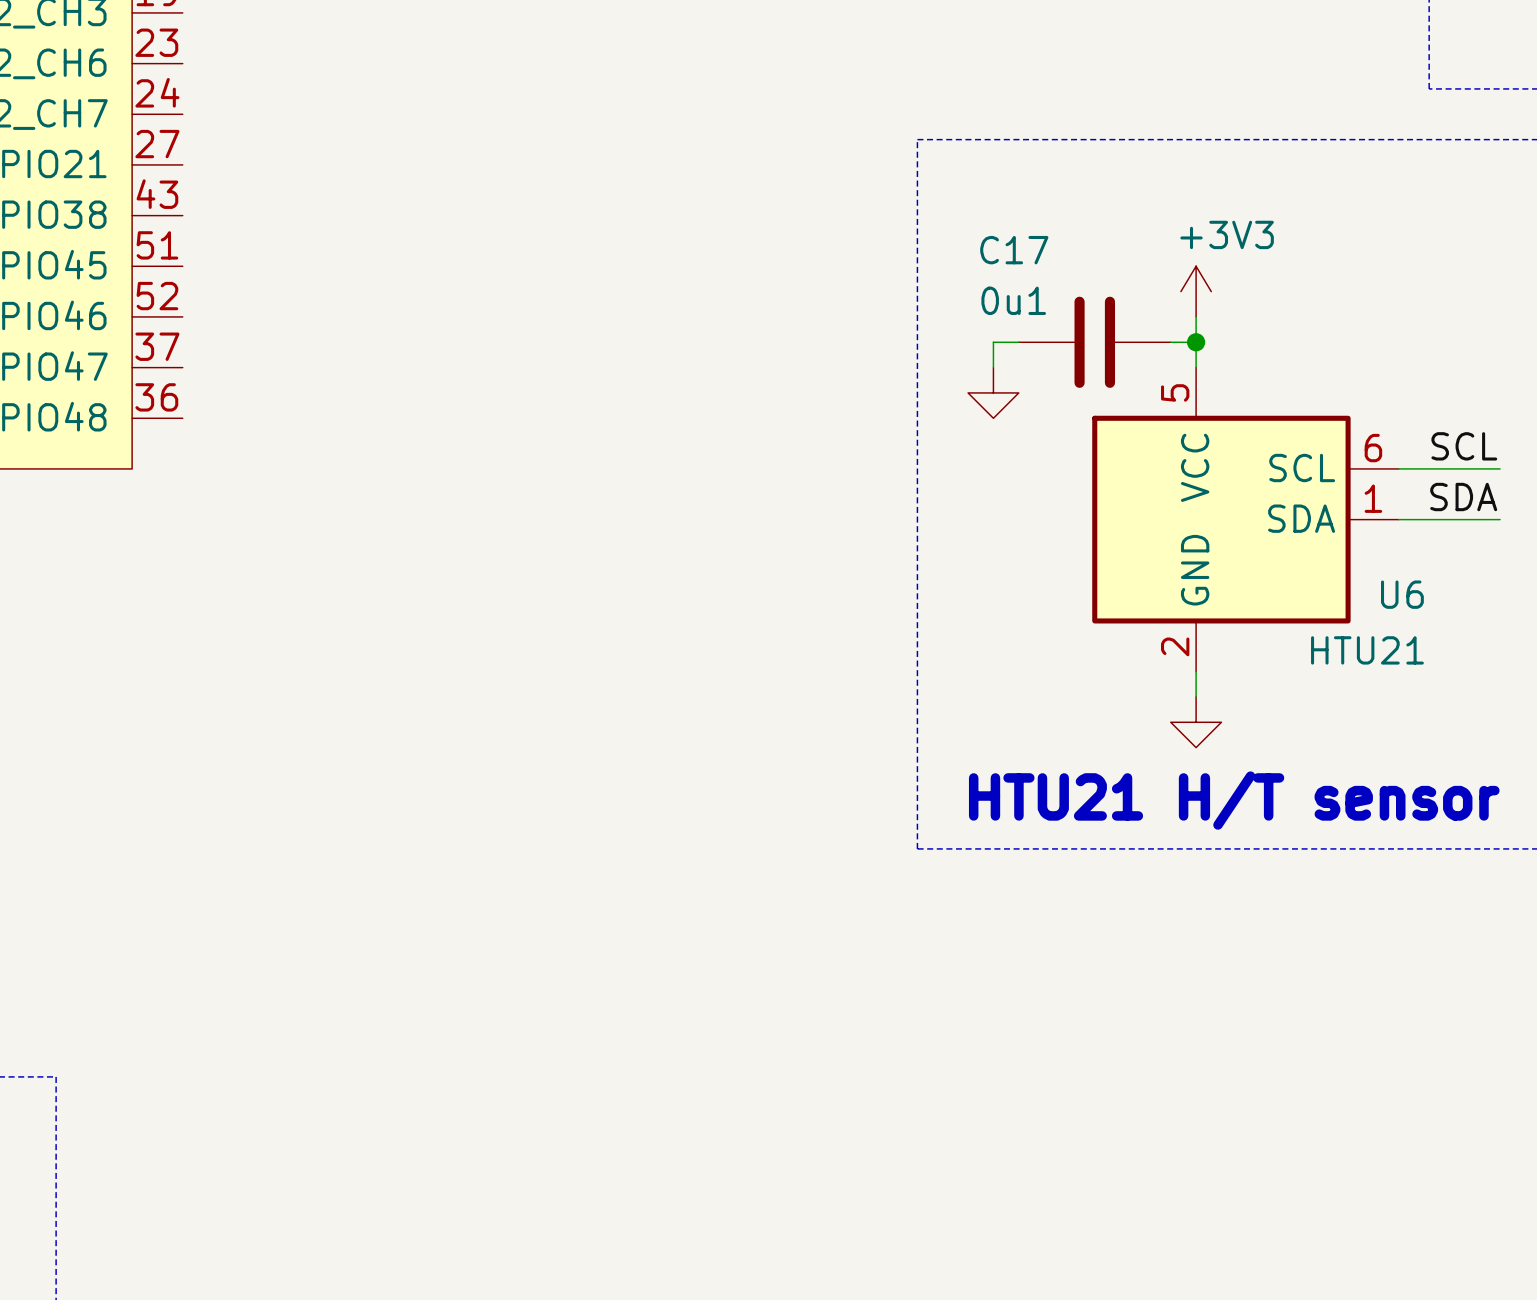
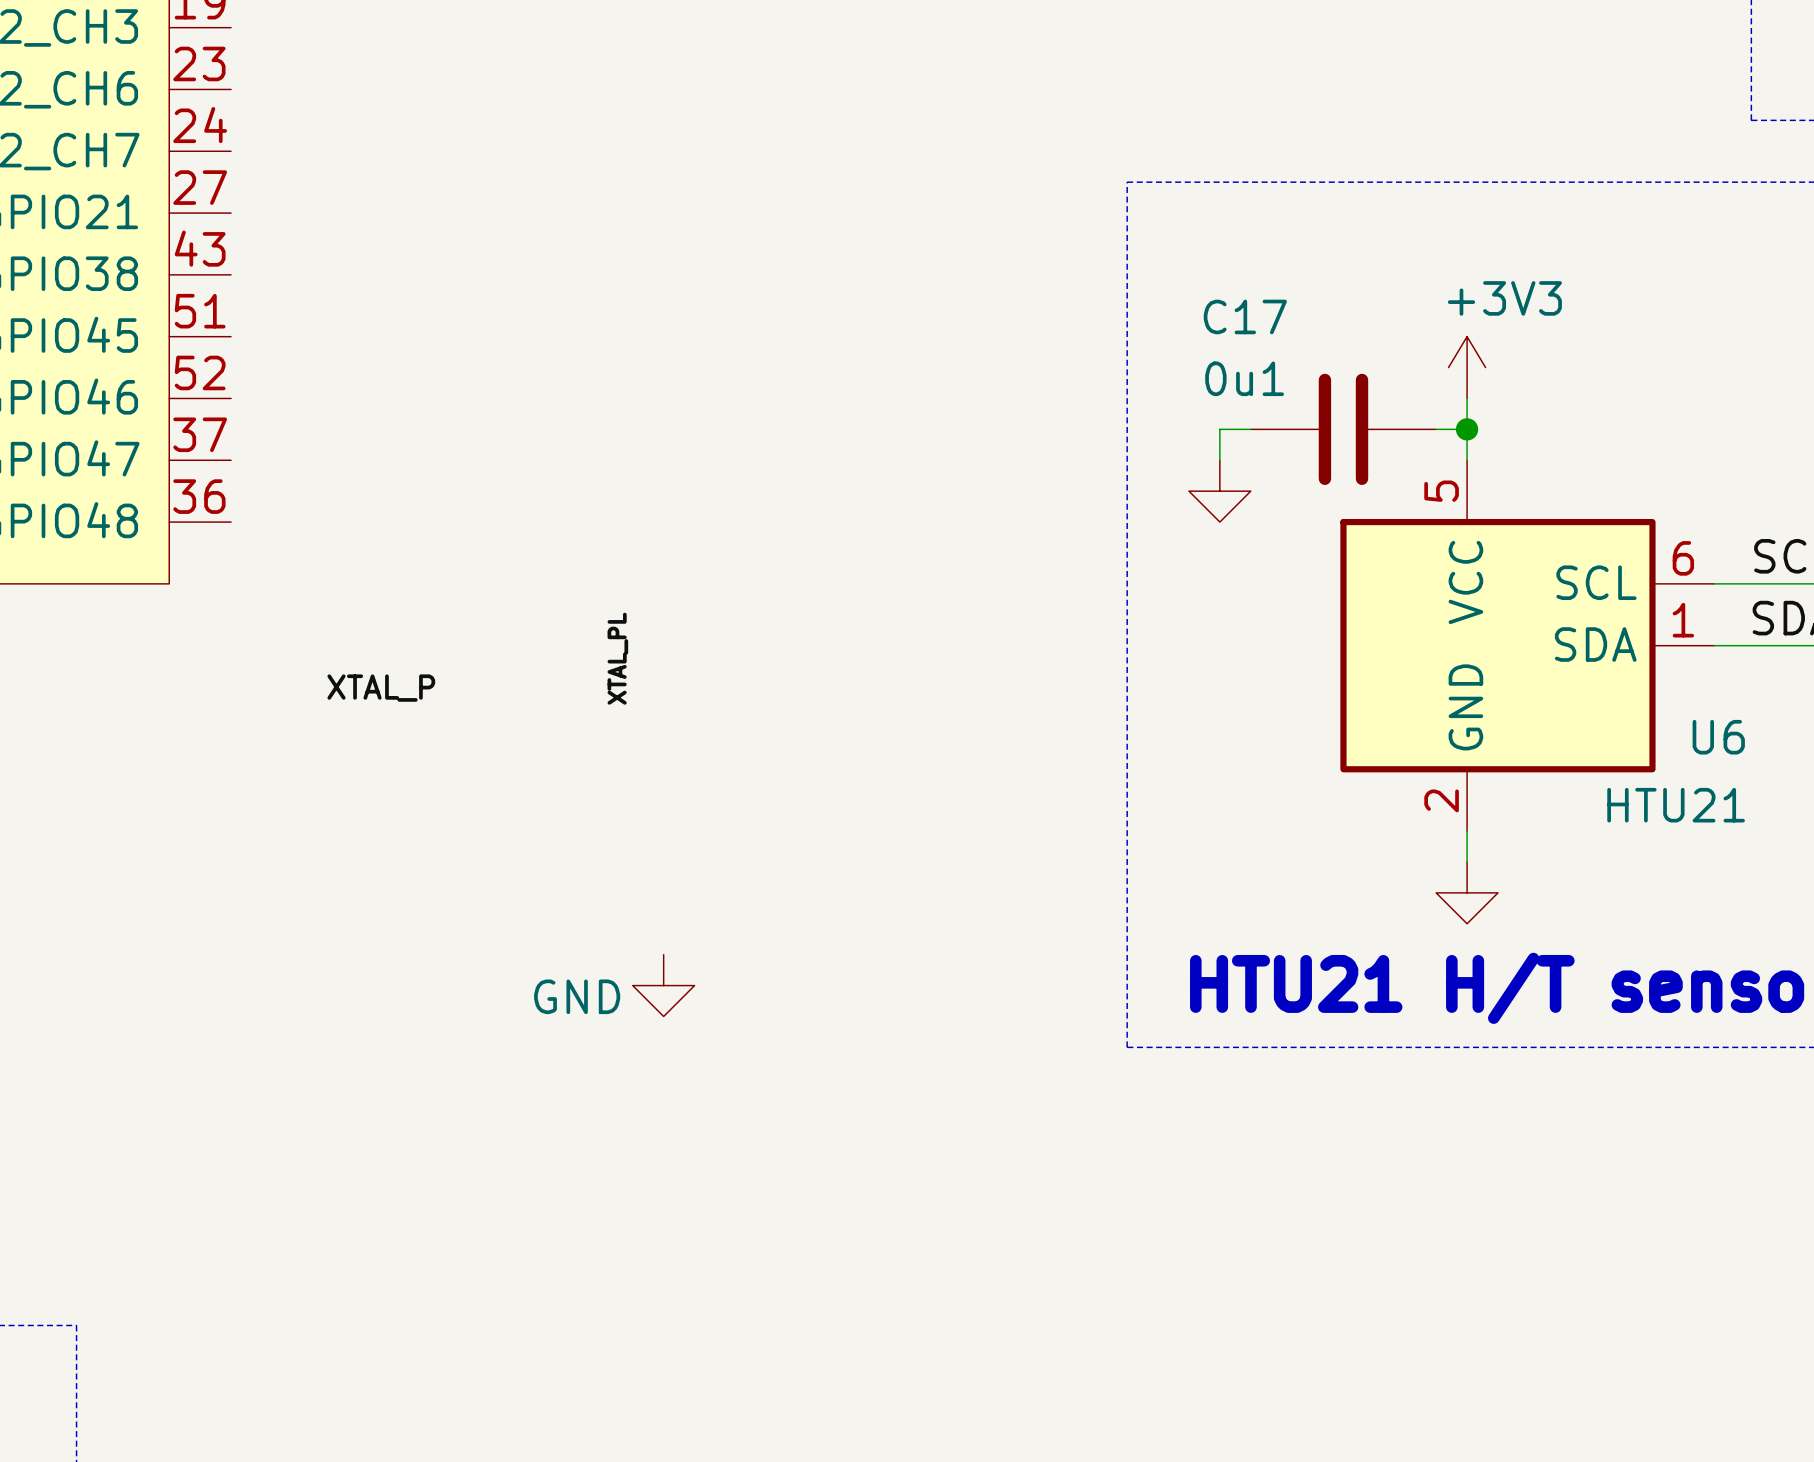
label: none -> XTAL_PL (617, 658)
label: none -> XTAL_P (381, 688)
power symbol: none -> GND (663, 985)

